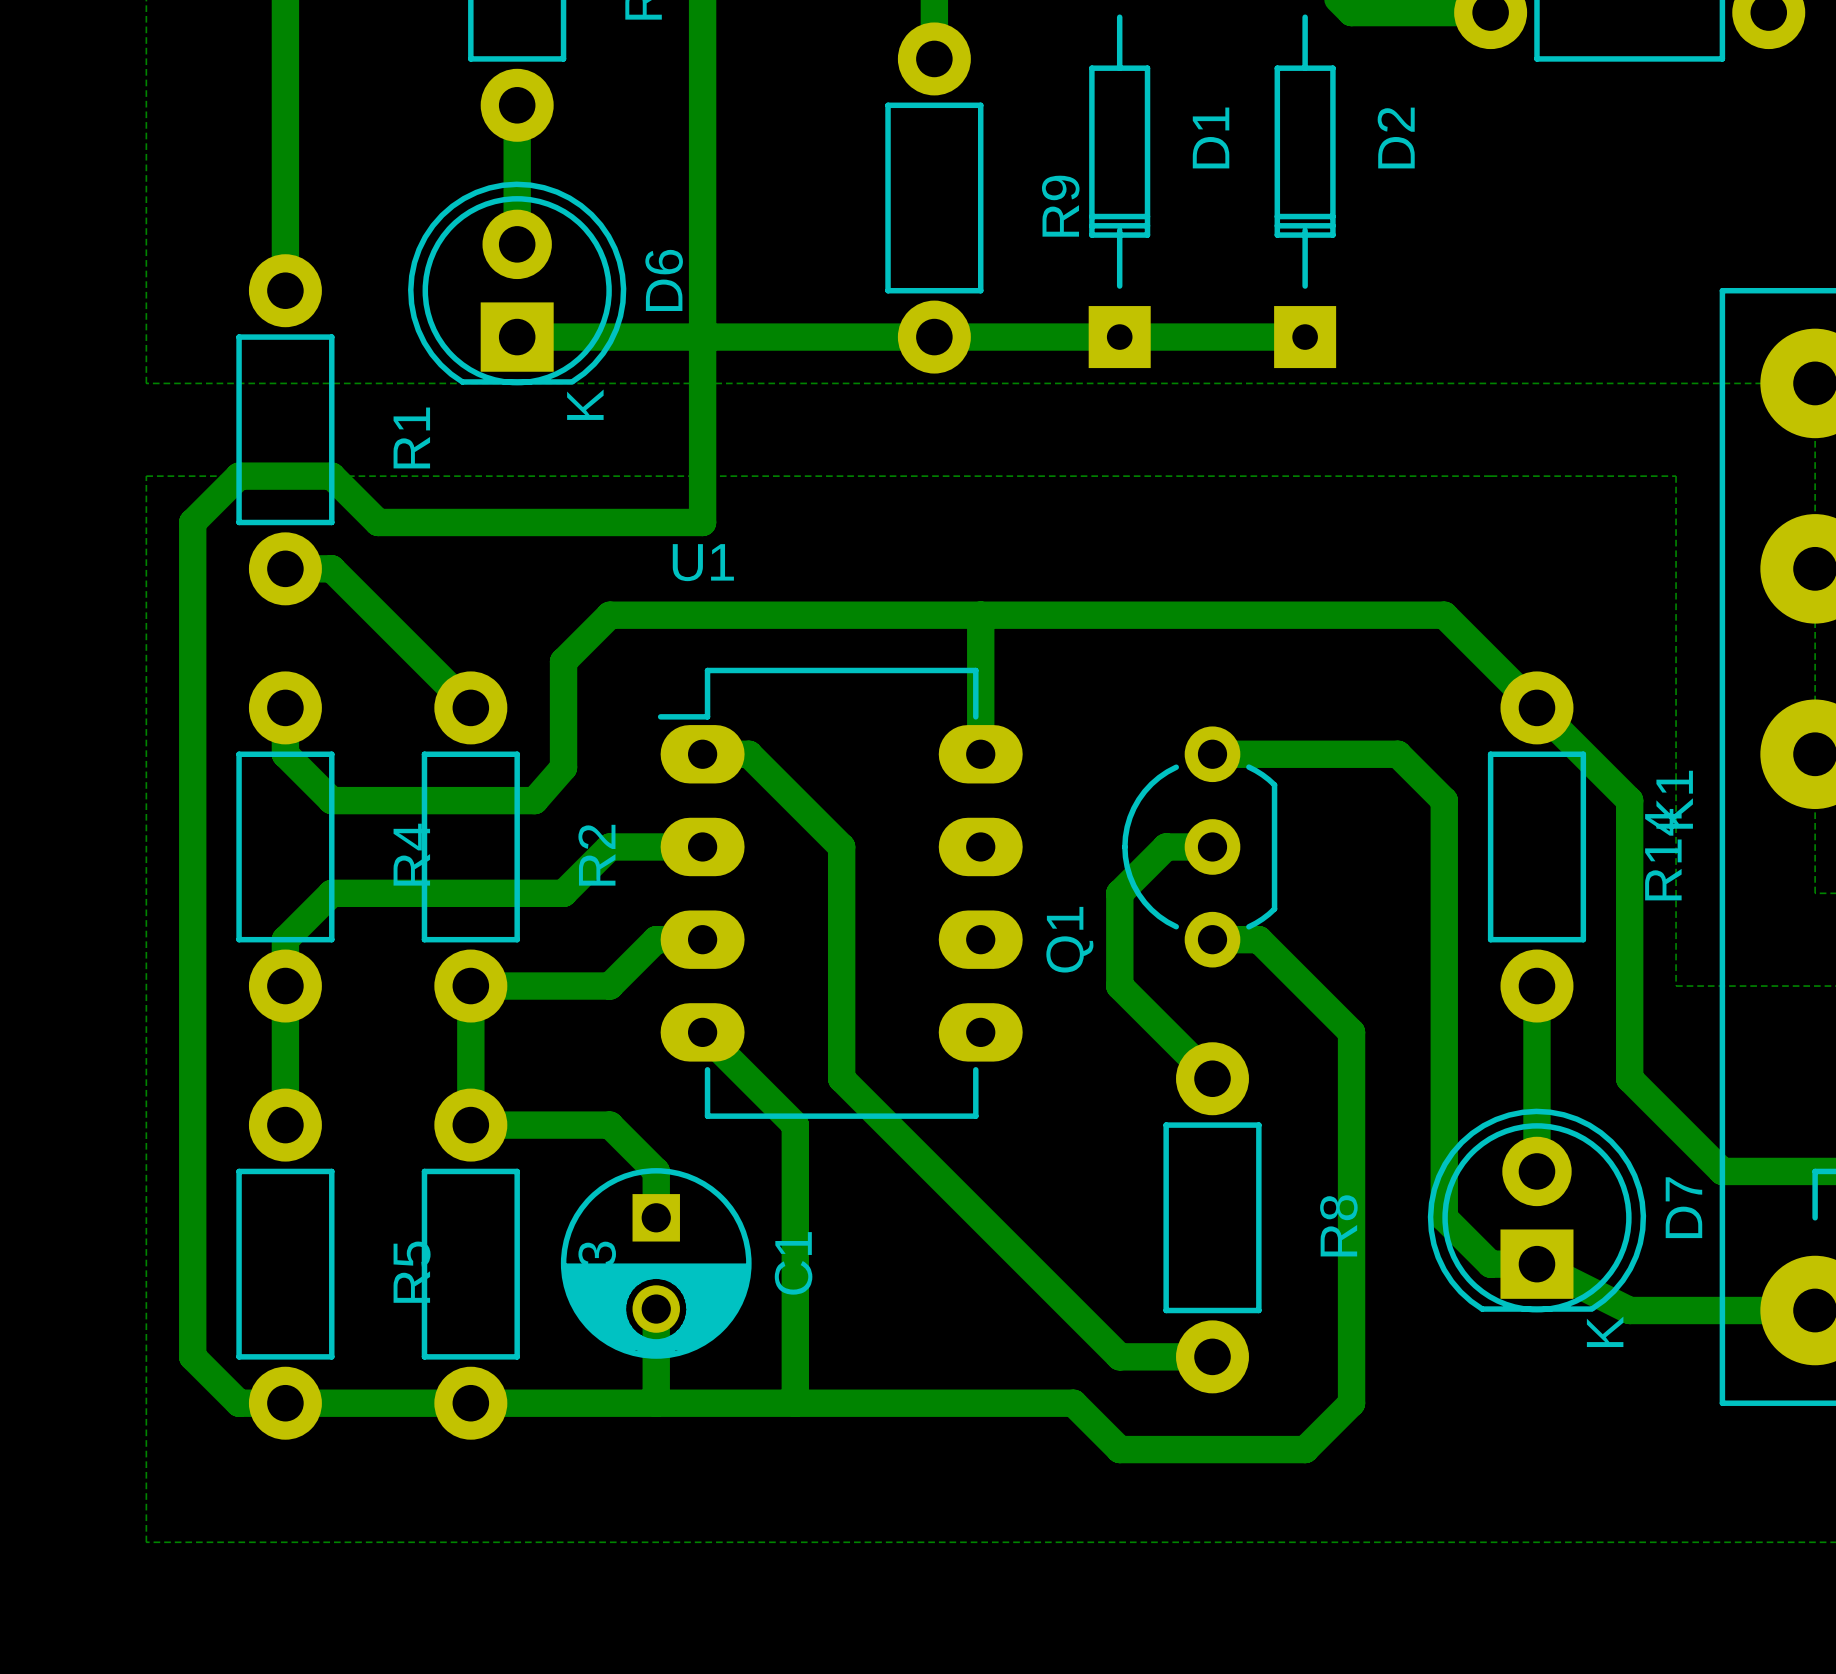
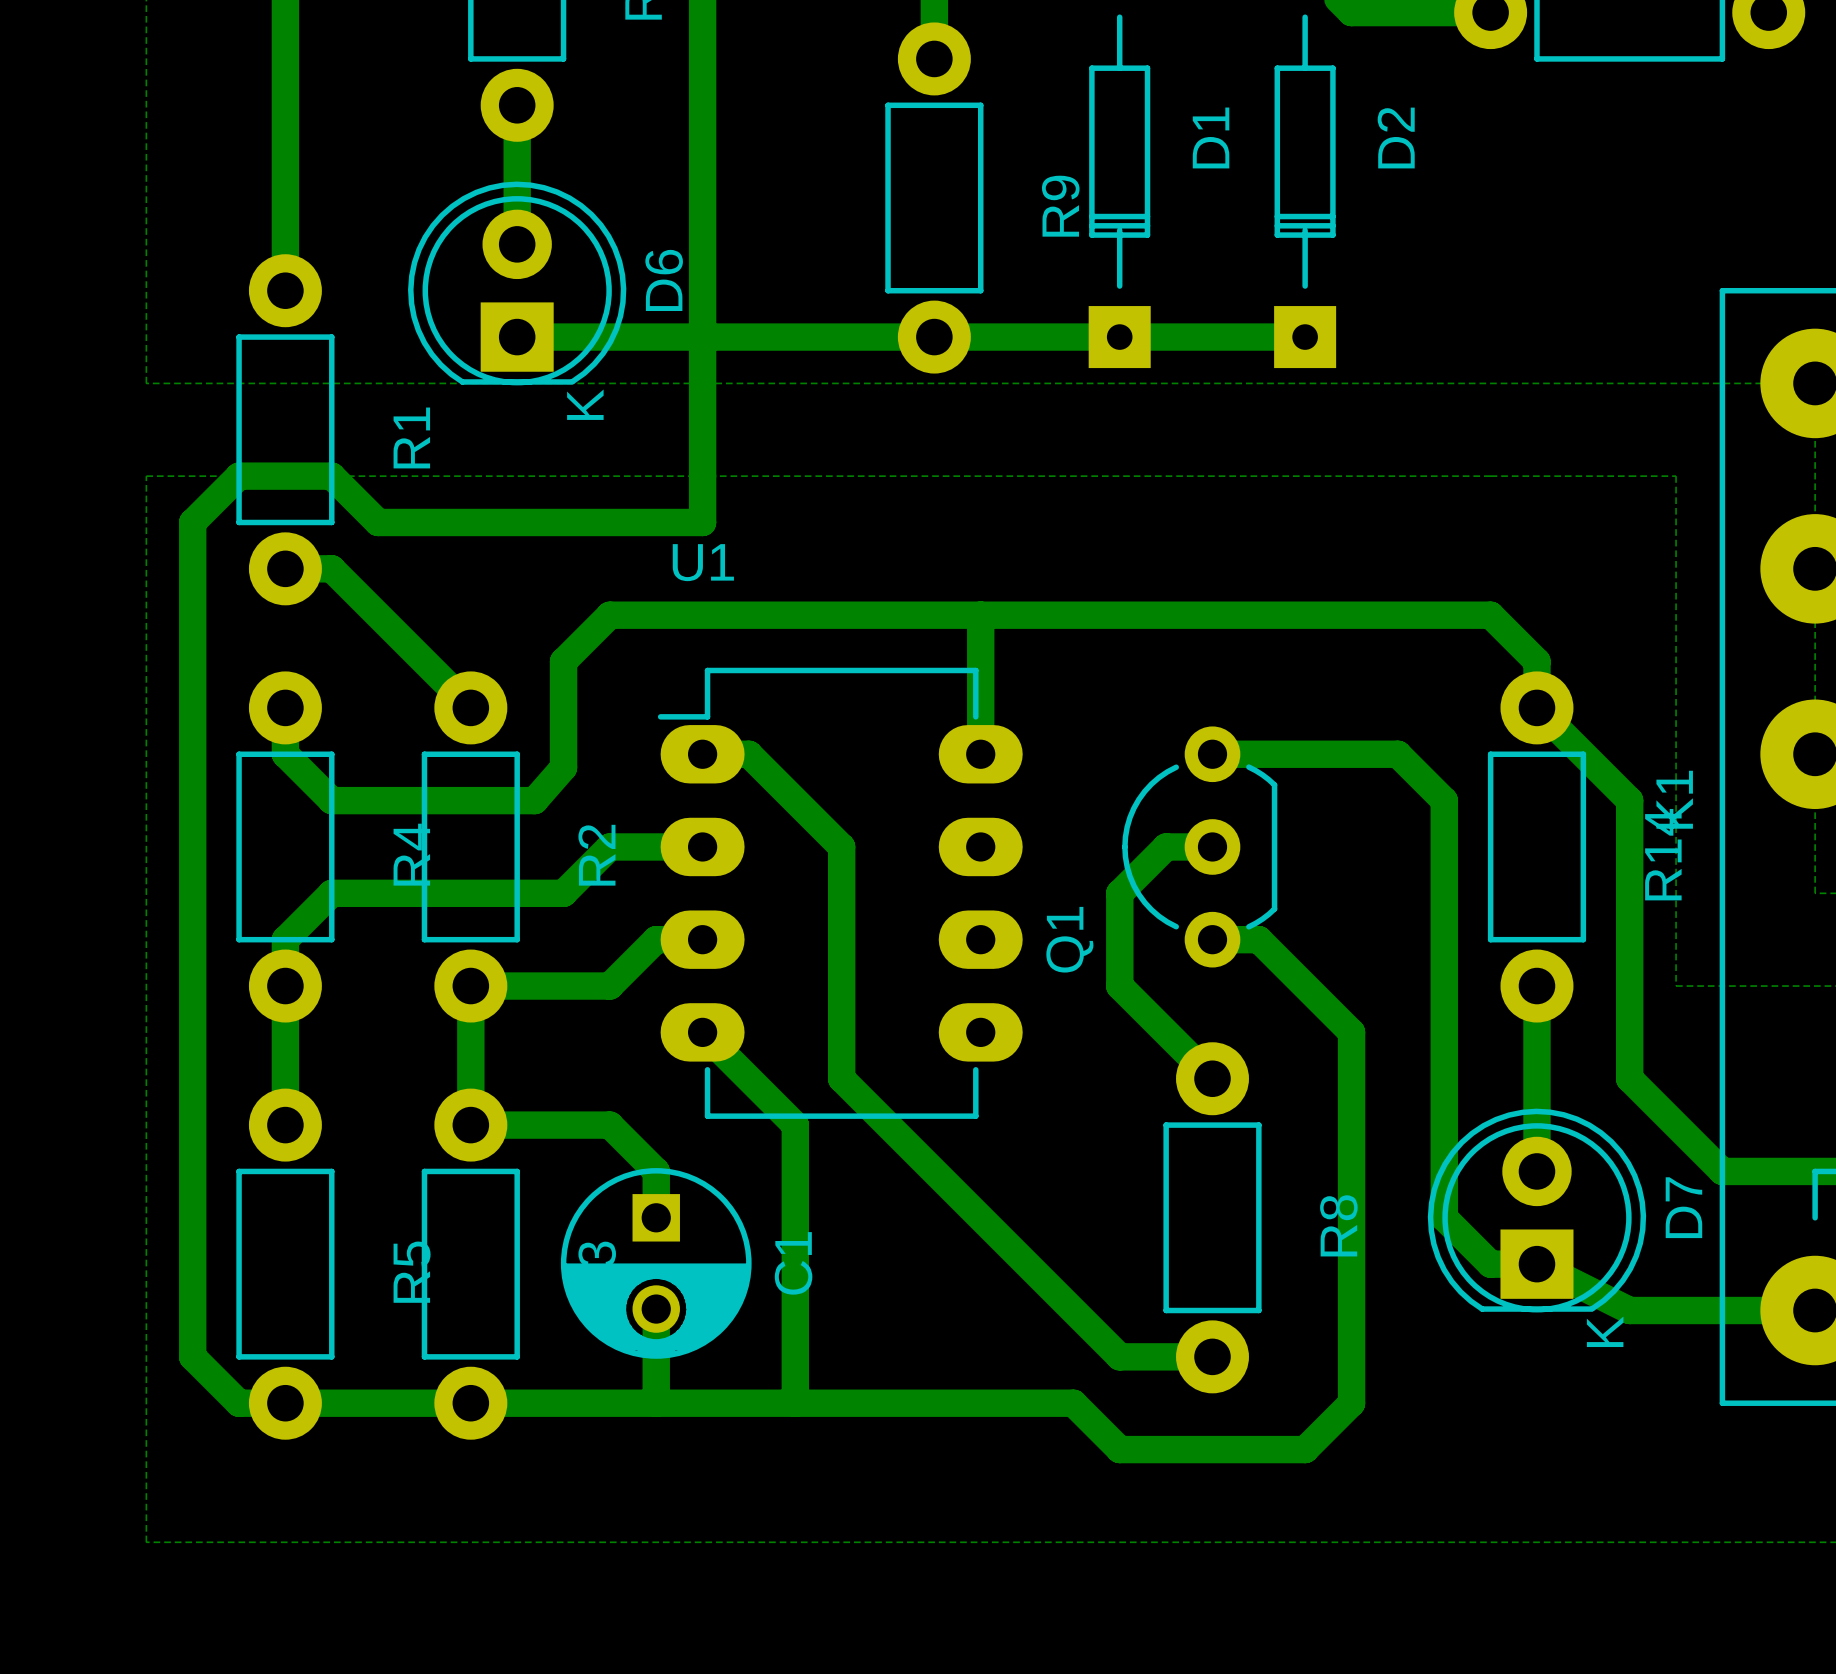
bottom track: (1444, 615) (1536, 707) -> (1444, 615) (1490, 615) (1536, 661) (1536, 707)

